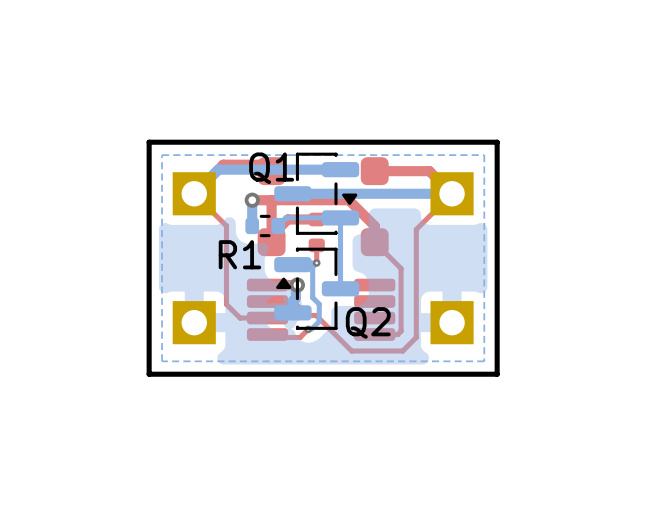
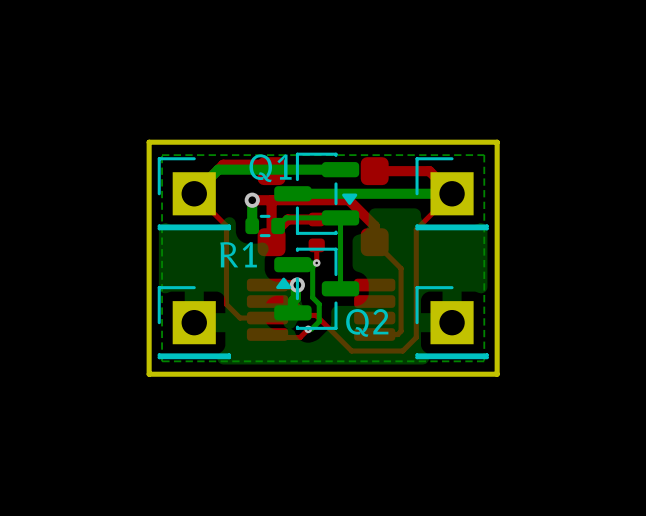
part side: top (194, 193) -> bottom (194, 193)
part side: top (452, 193) -> bottom (452, 193)
part side: top (194, 322) -> bottom (194, 322)
part side: top (452, 322) -> bottom (452, 322)

